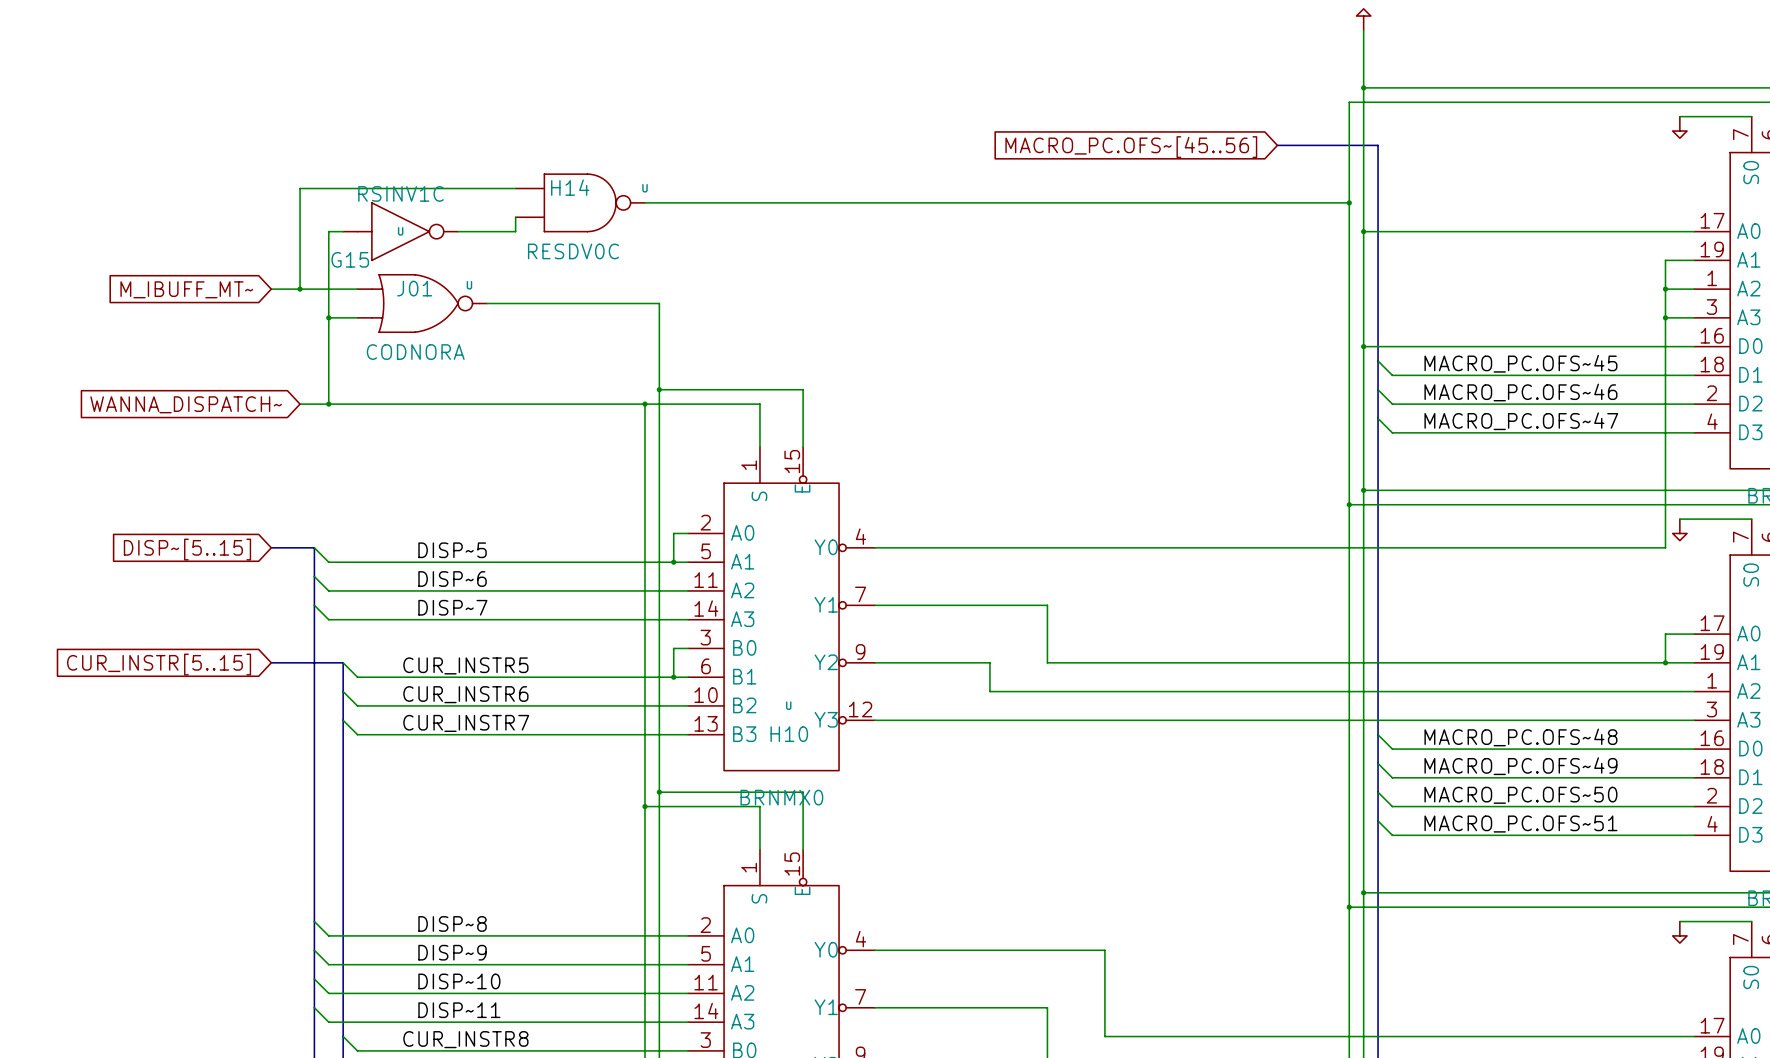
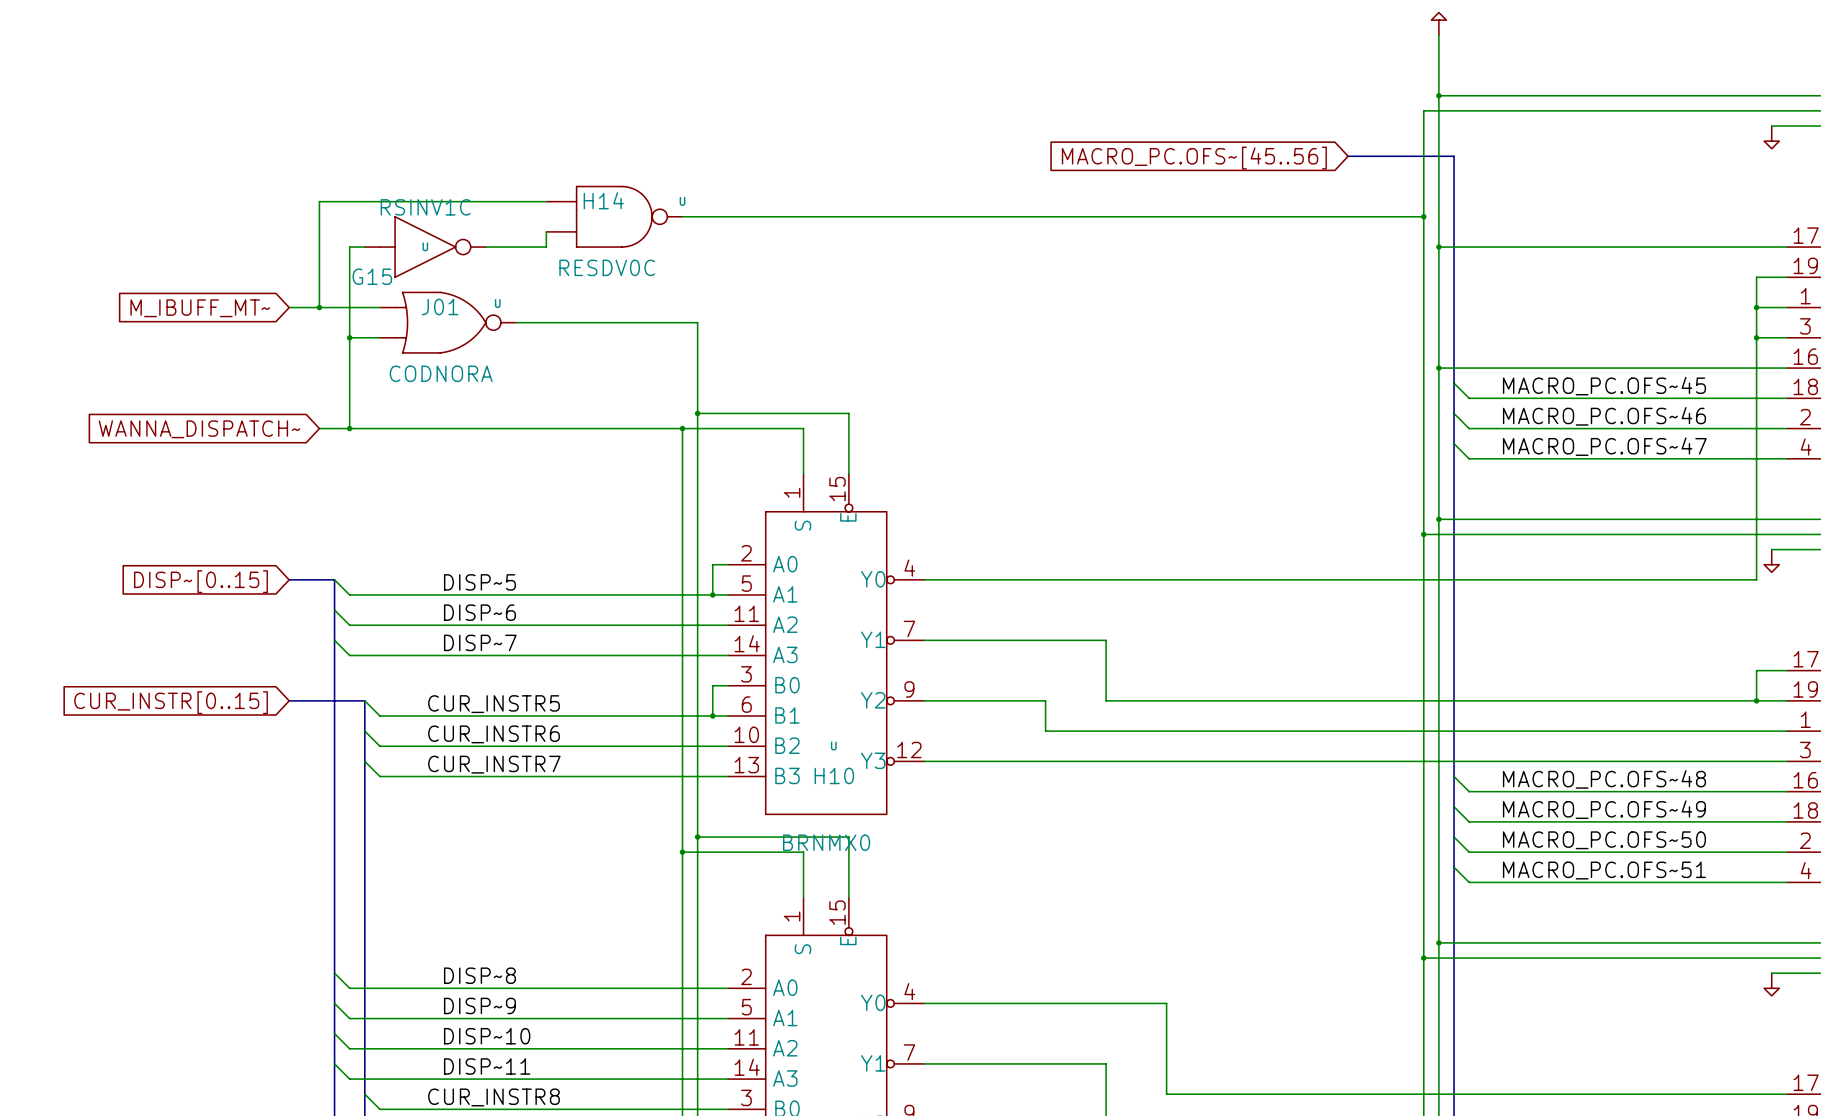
global label: DISP~[5..15] (187, 549) -> DISP~[0..15] (200, 581)
global label: CUR_INSTR[5..15] (159, 664) -> CUR_INSTR[0..15] (171, 702)

